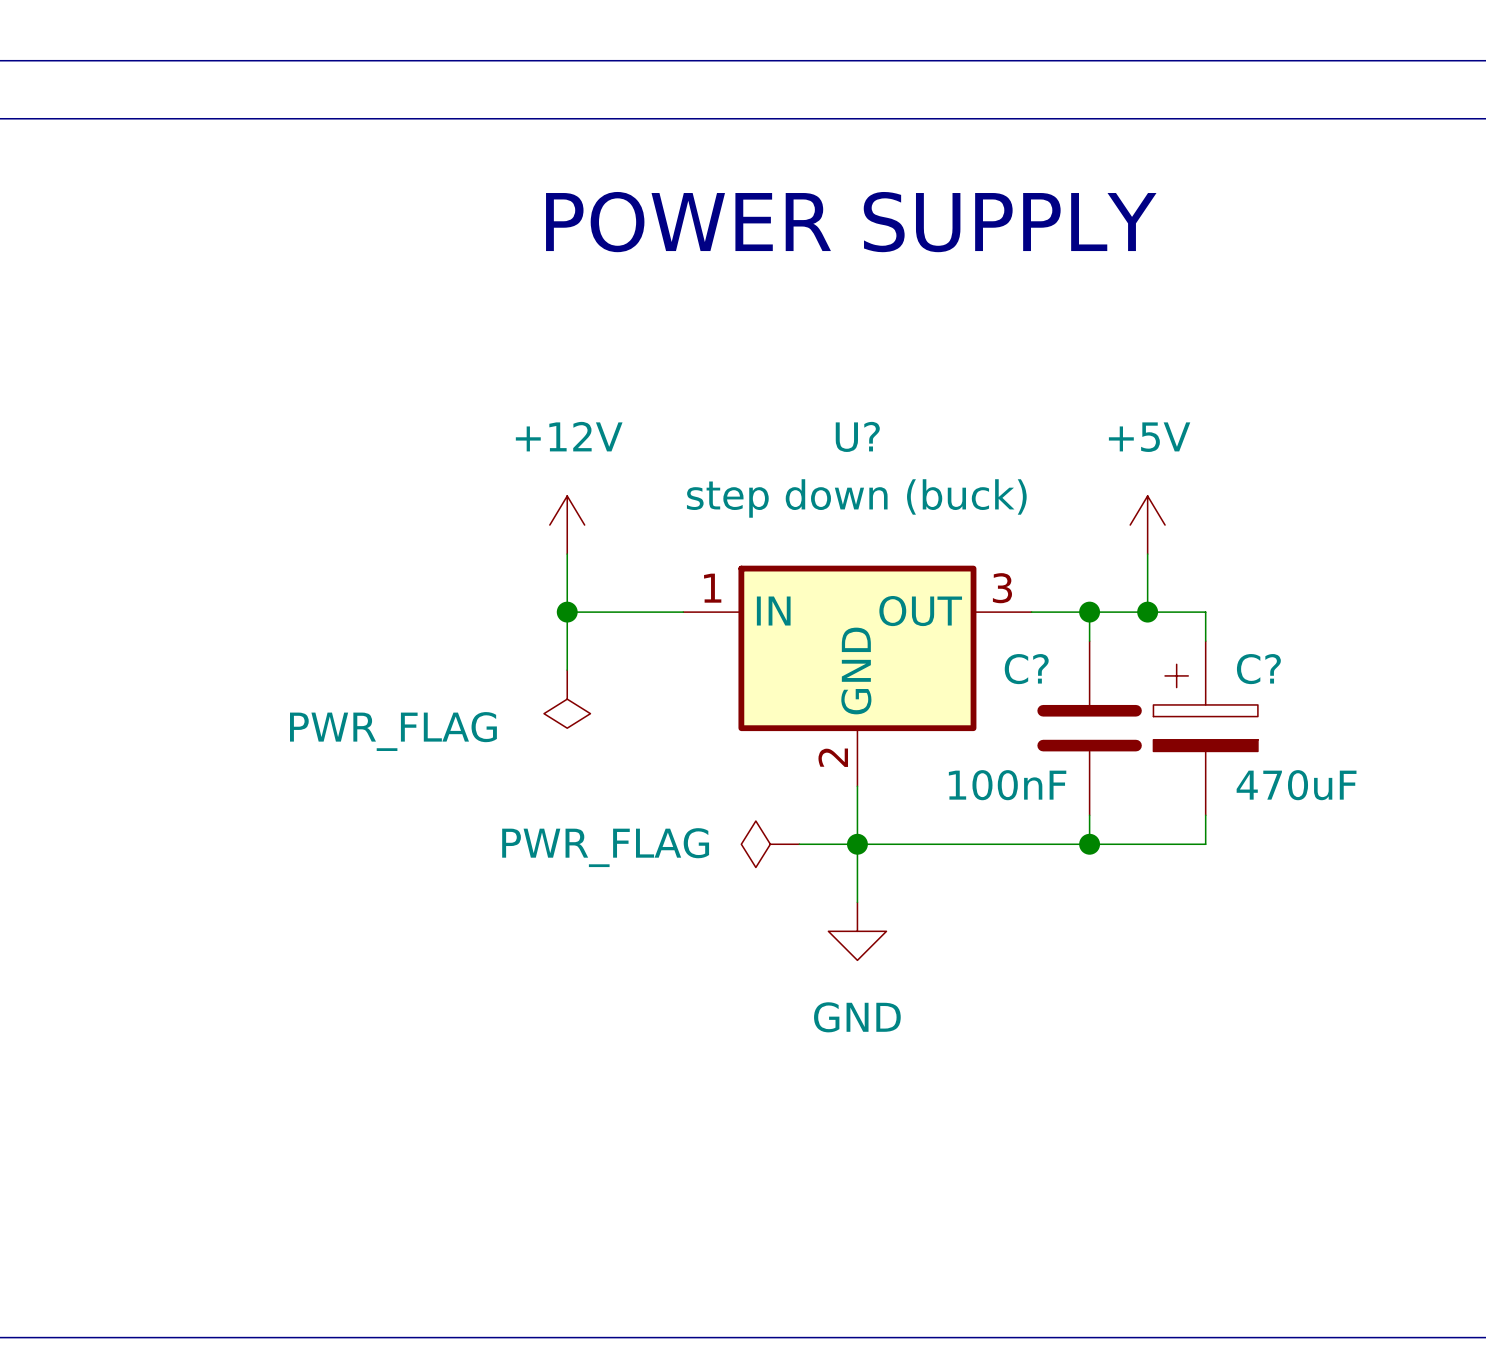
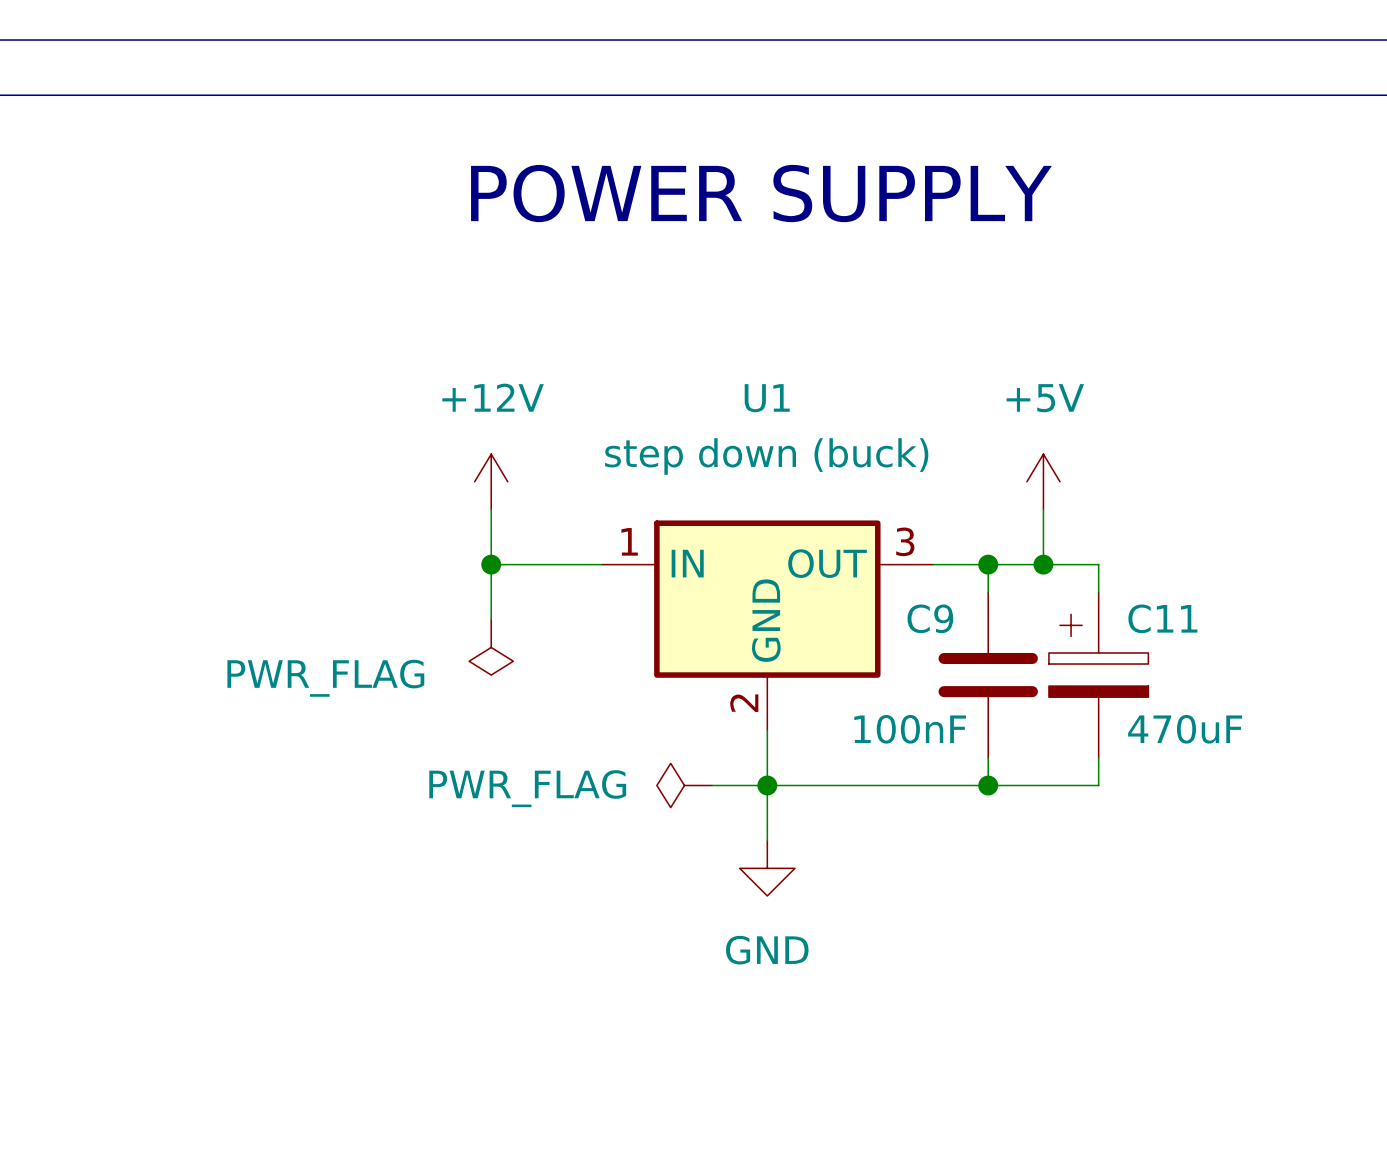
U? name: U? (857, 436) -> U1 (767, 398)
C? name: C? (1026, 669) -> C9 (930, 618)
C? name: C? (1258, 669) -> C11 (1162, 618)

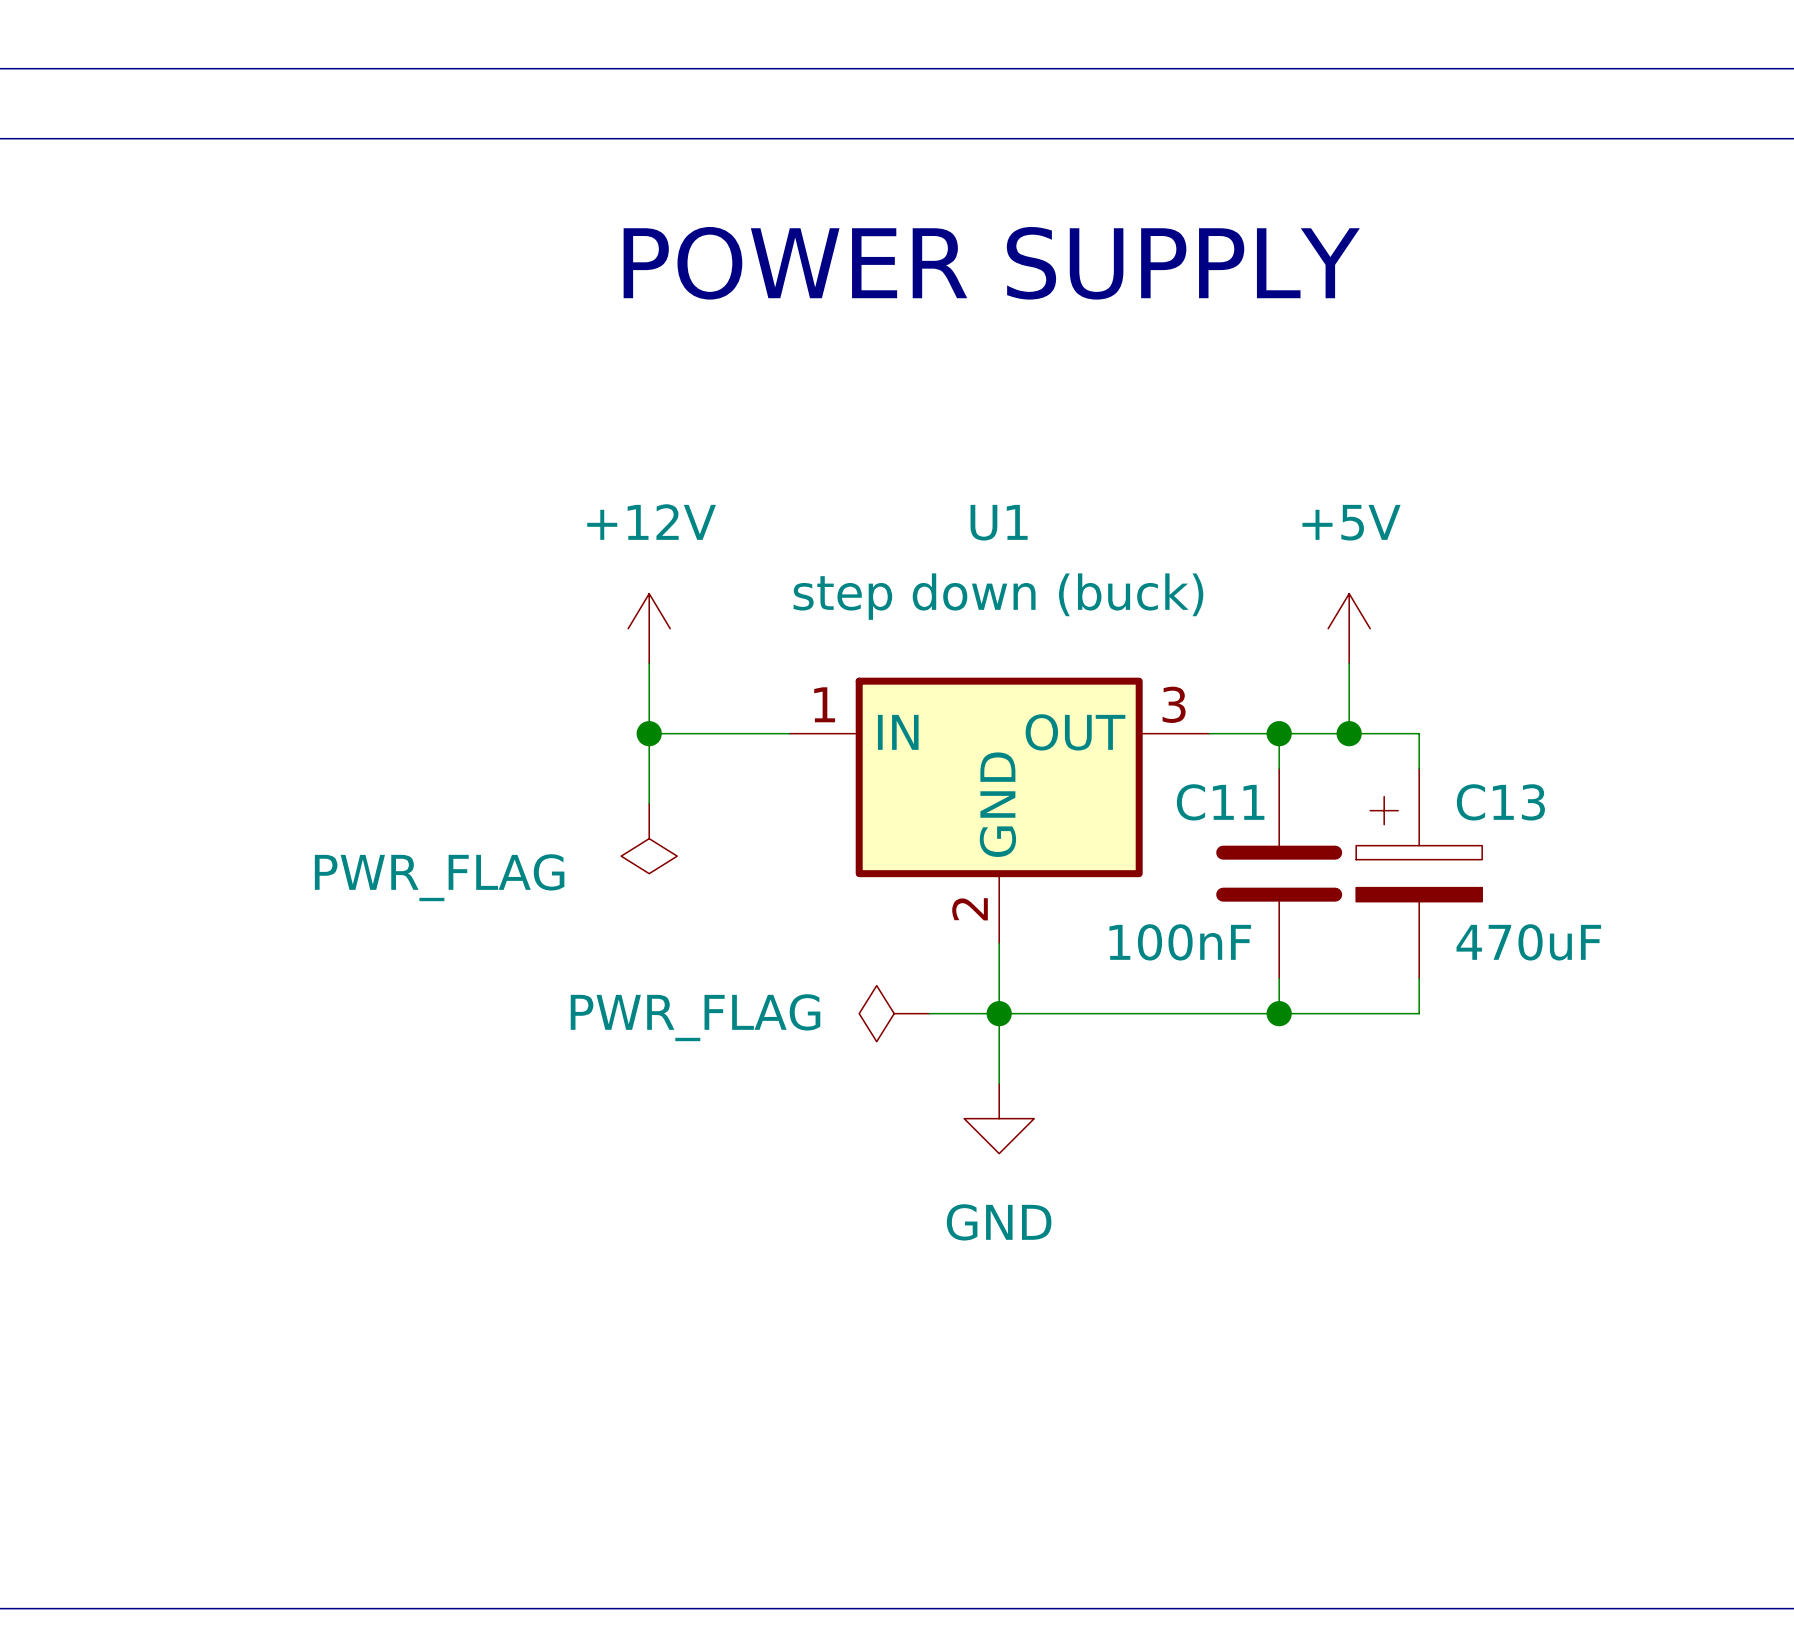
C9 name: C9 (930, 618) -> C11 (1220, 802)
C11 name: C11 (1162, 618) -> C13 (1500, 802)

